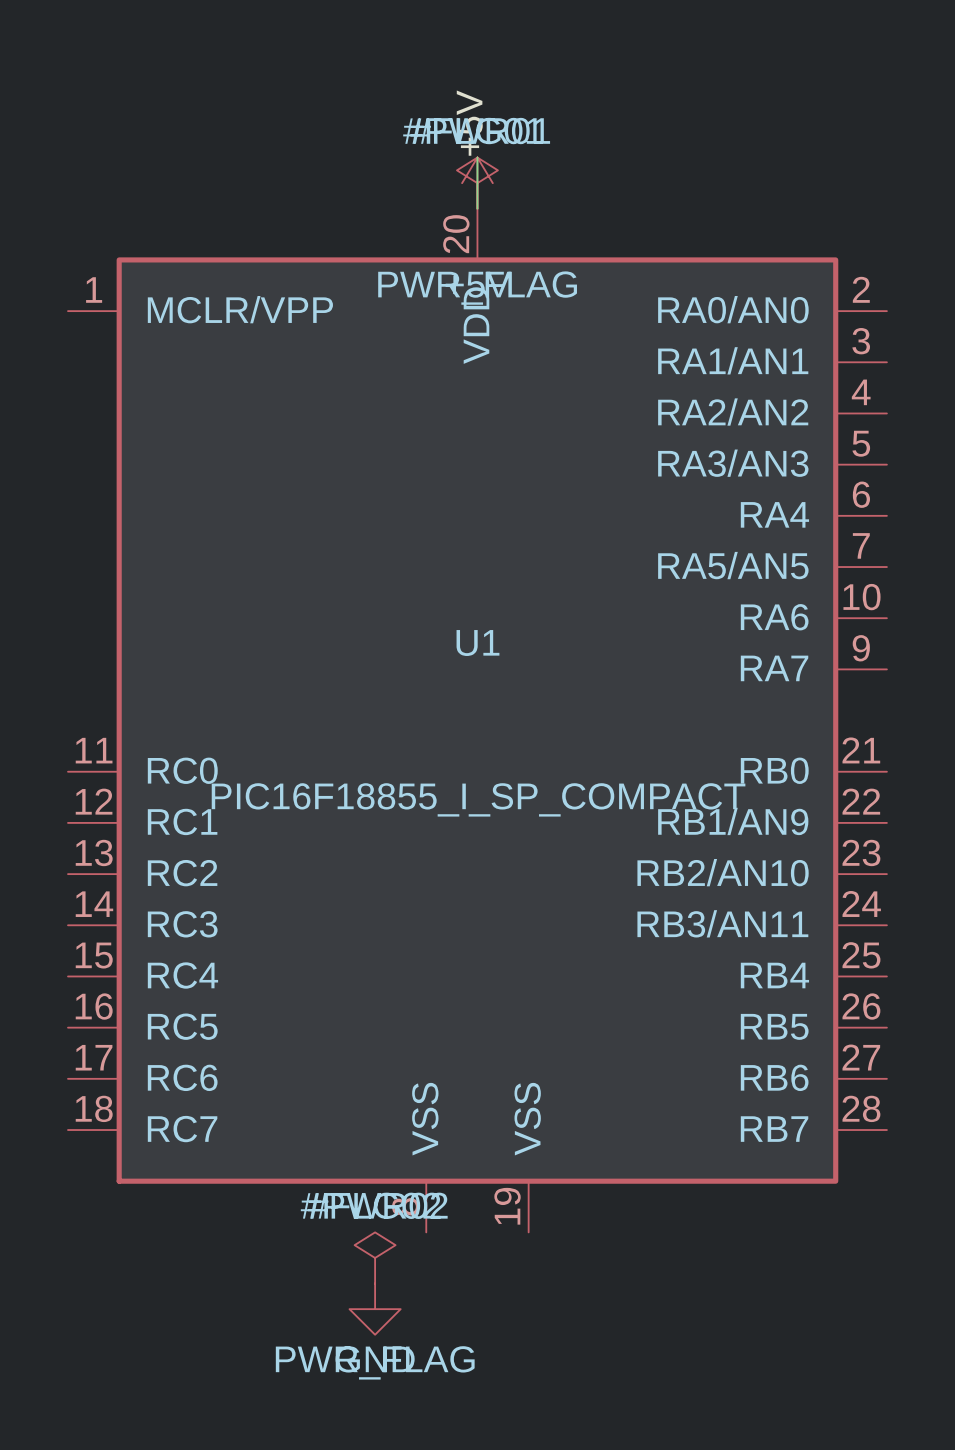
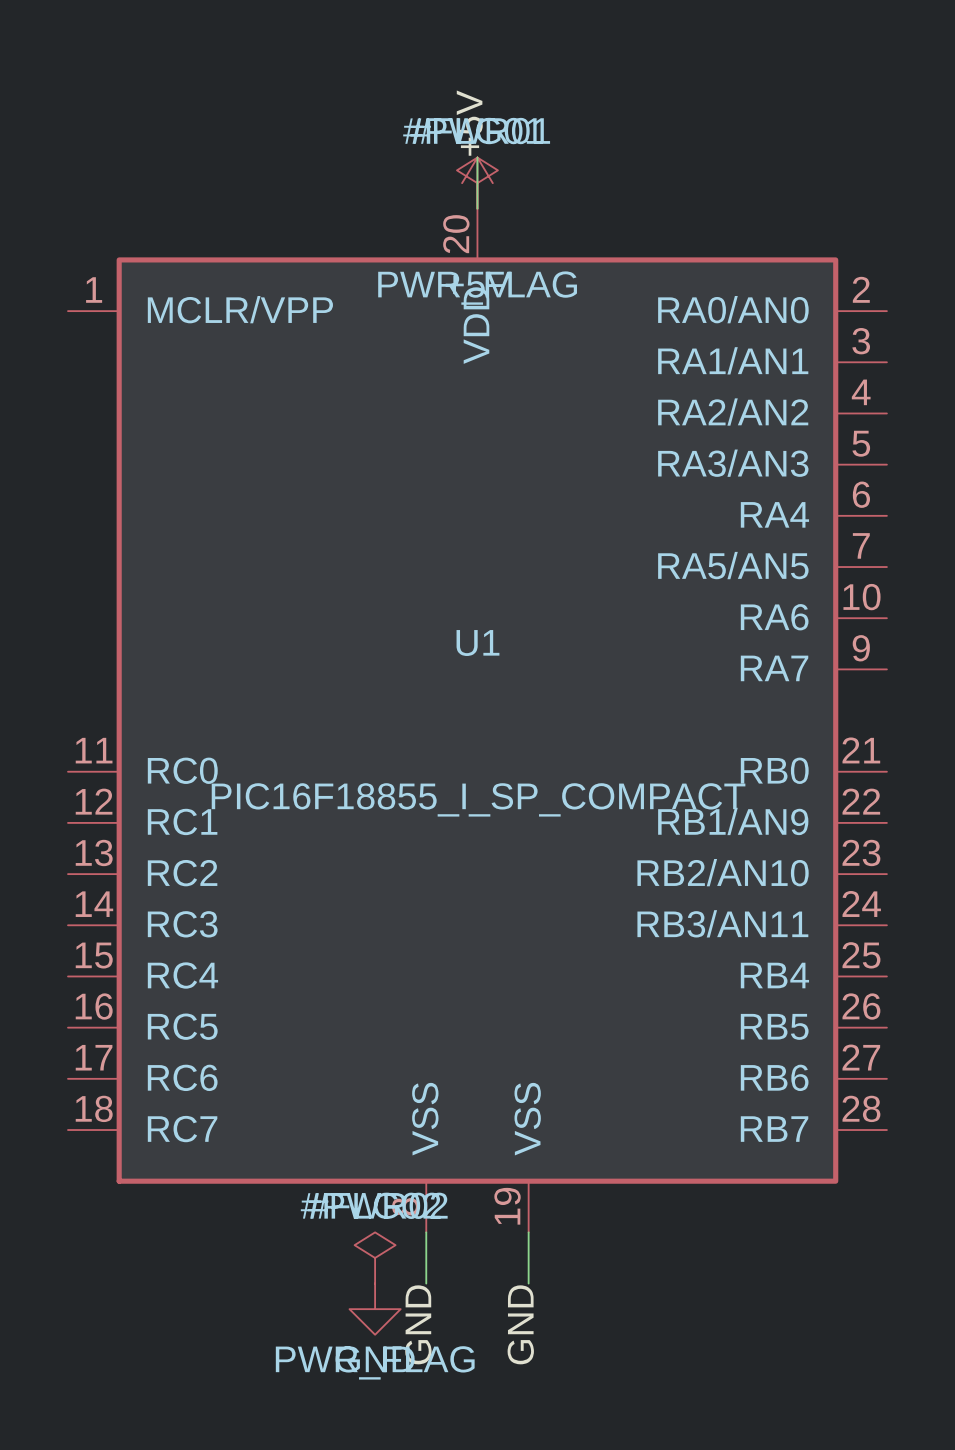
wire: none -> (426, 1232) (426, 1283)
wire: none -> (528, 1232) (528, 1283)
label: none -> GND (418, 1324)
label: none -> GND (520, 1324)

